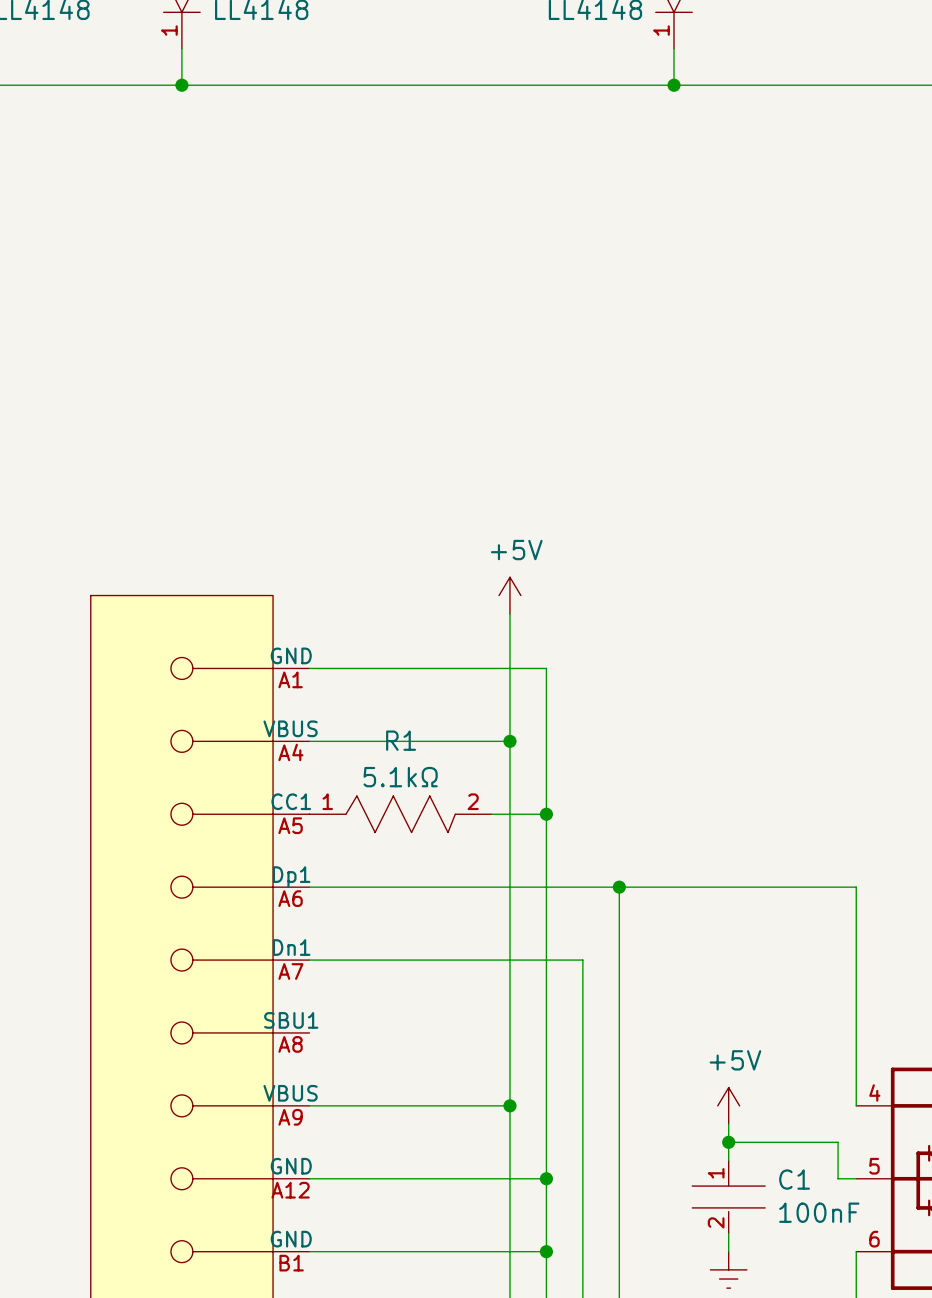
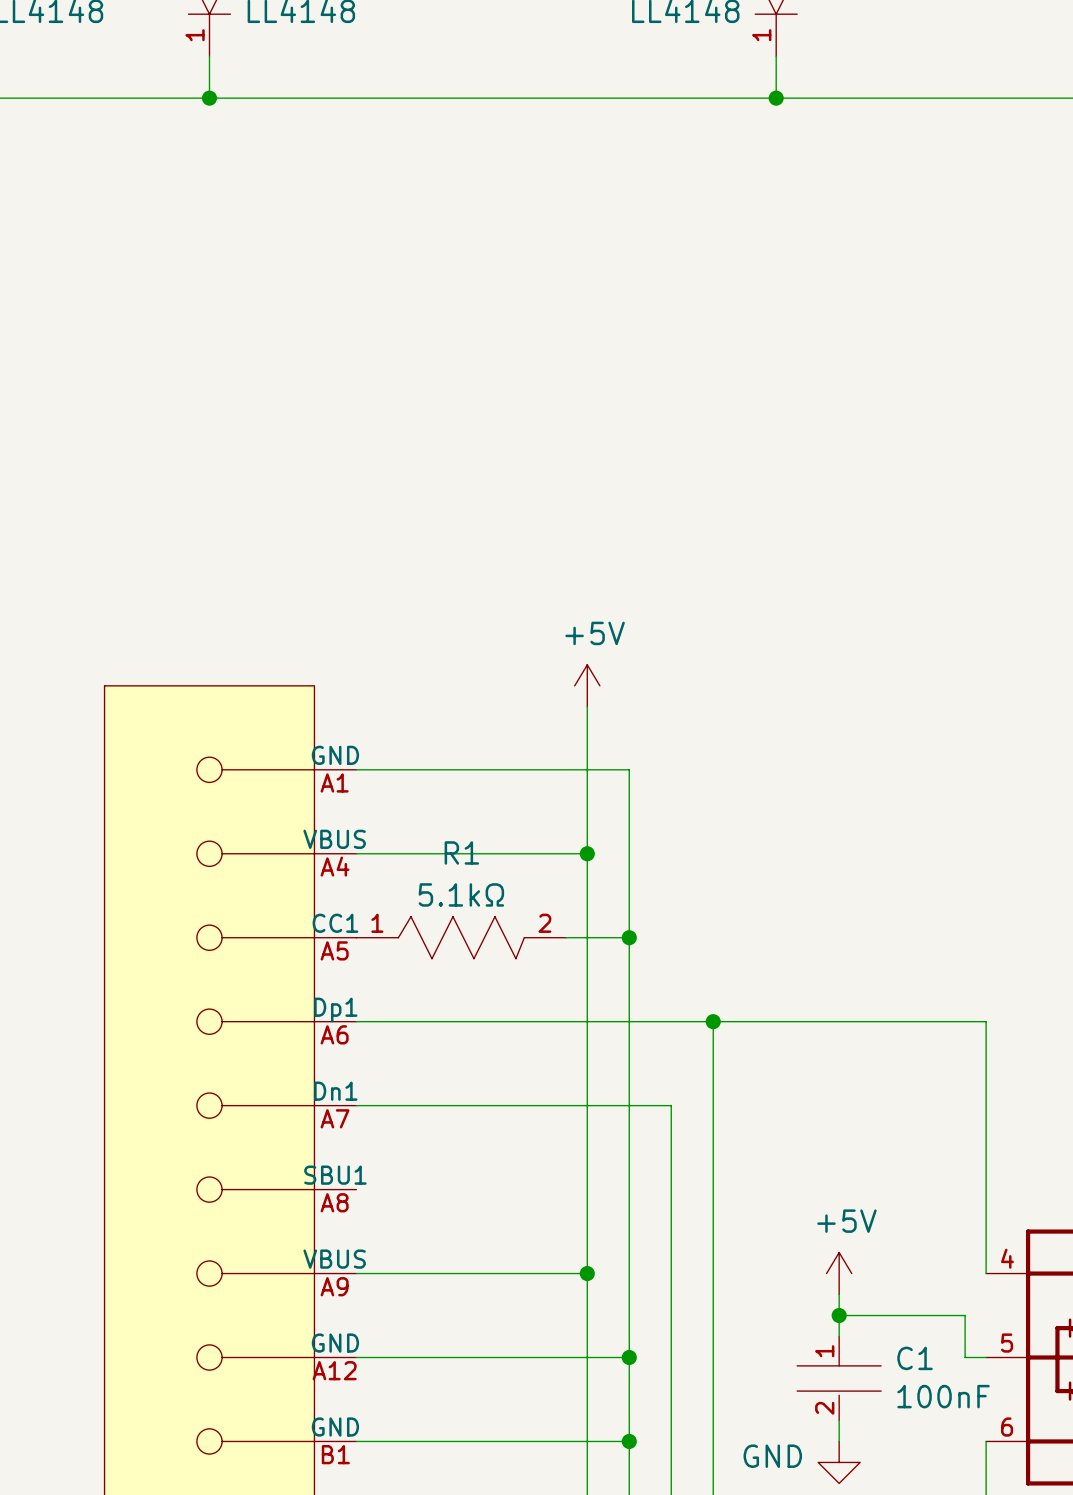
power symbol shape: [710, 1251, 747, 1289] -> [818, 1441, 861, 1484]
power symbol text: none -> GND (772, 1456)

